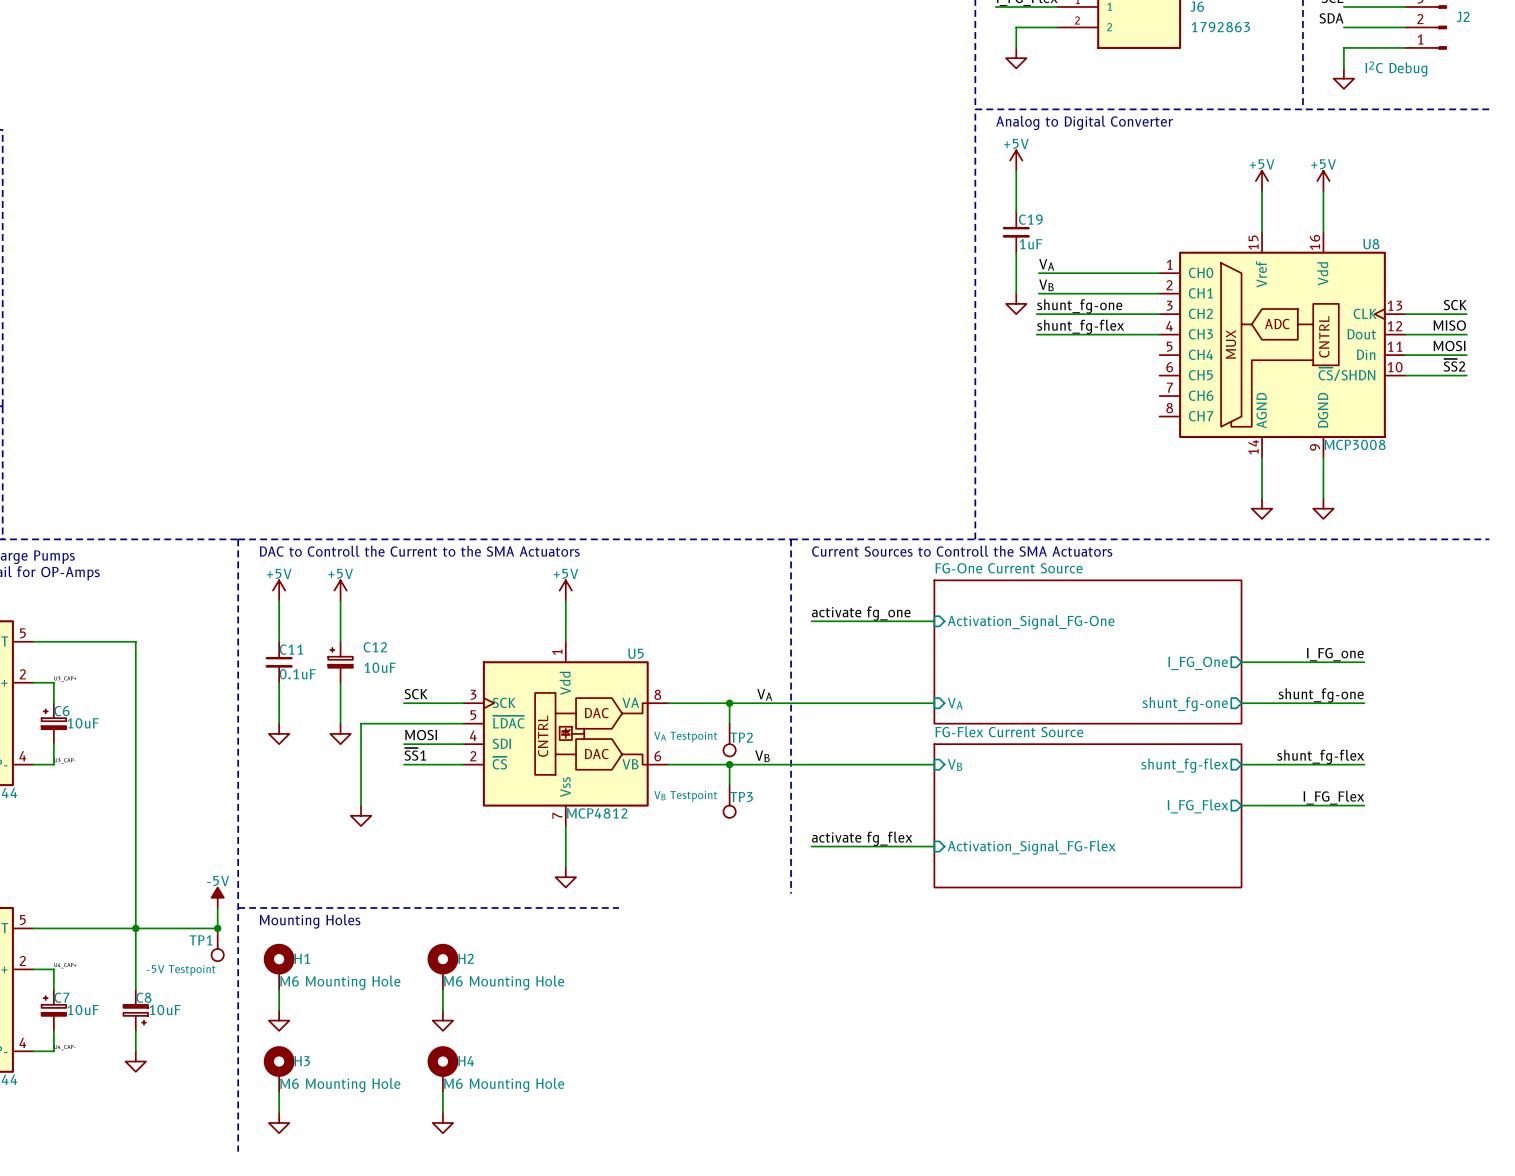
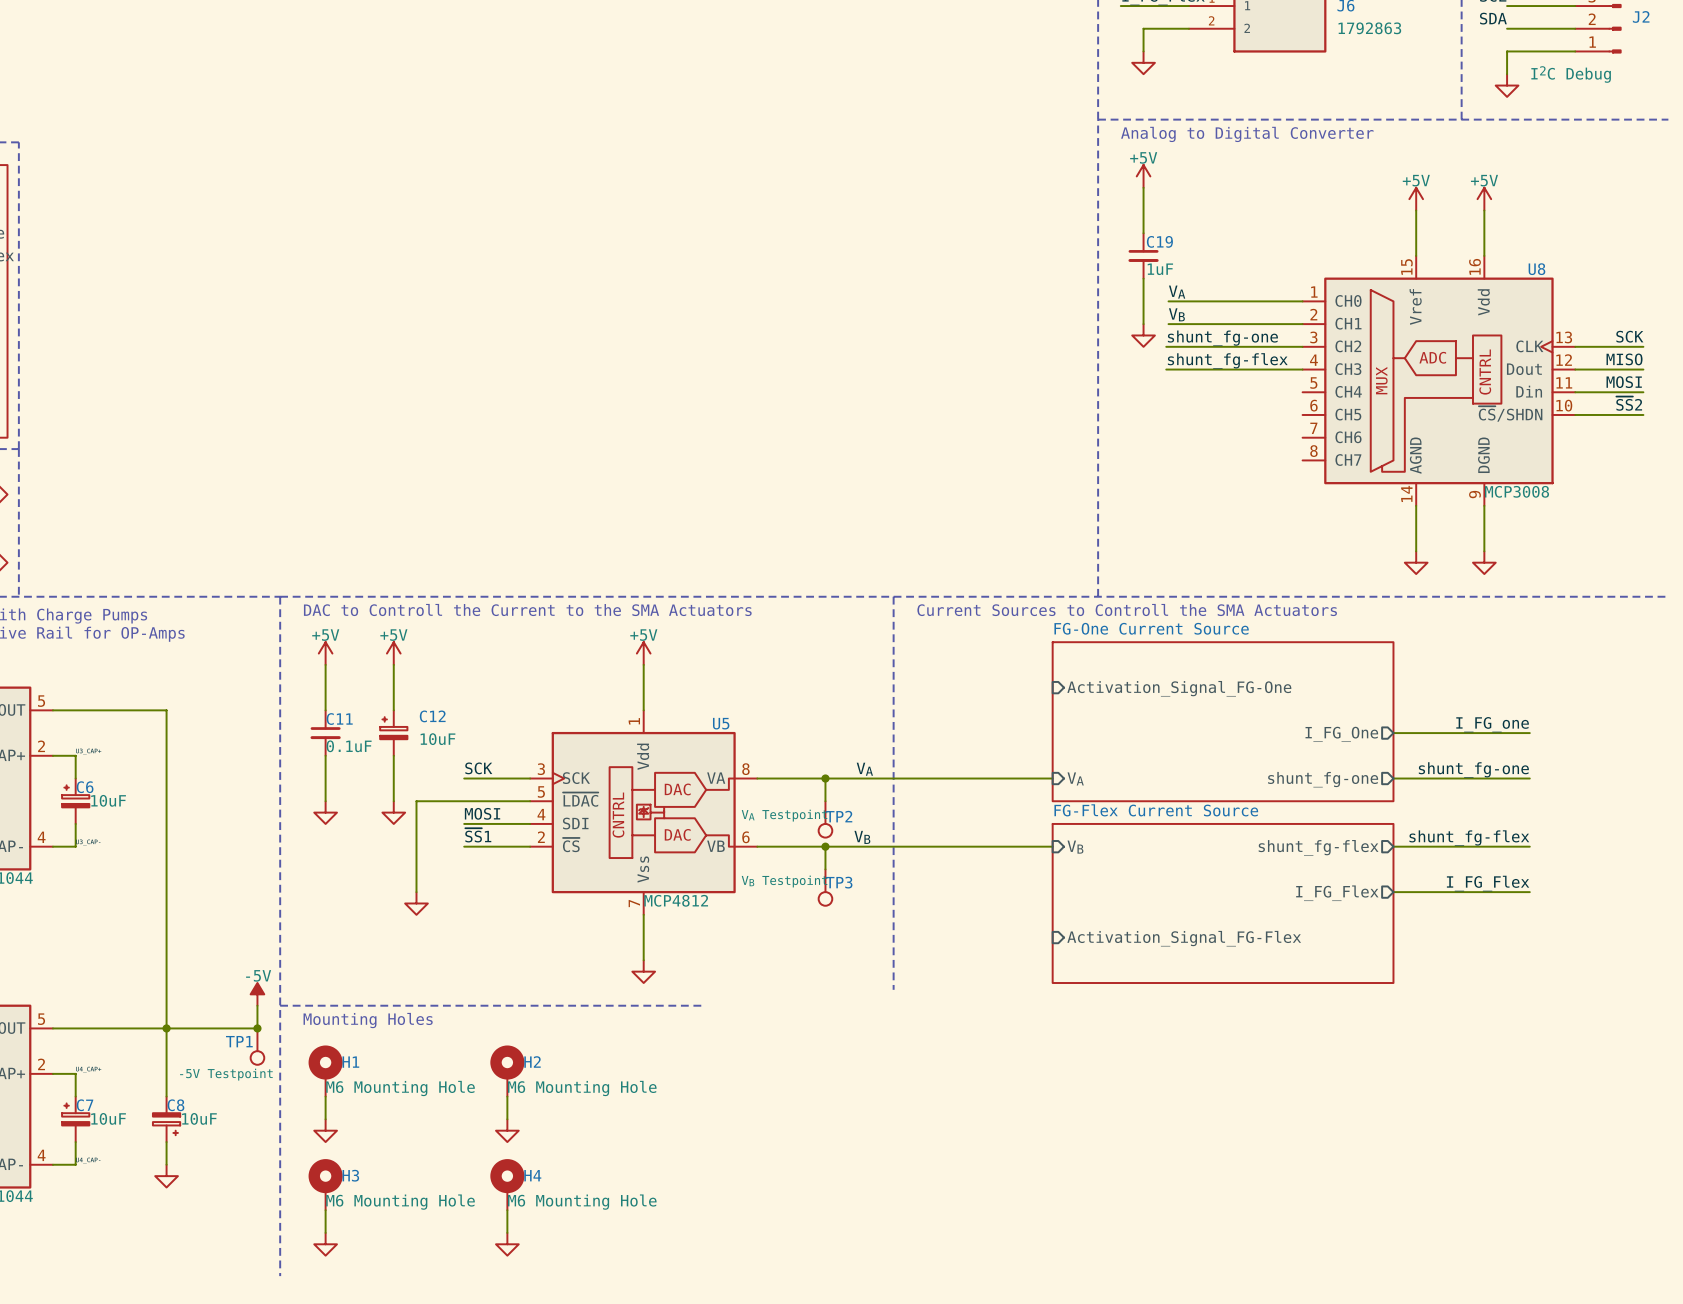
label: activate fg_one (861, 613) -> none
wire: (811, 621) (934, 621) -> none
label: activate fg_flex (862, 838) -> none
wire: (811, 846) (934, 846) -> none

